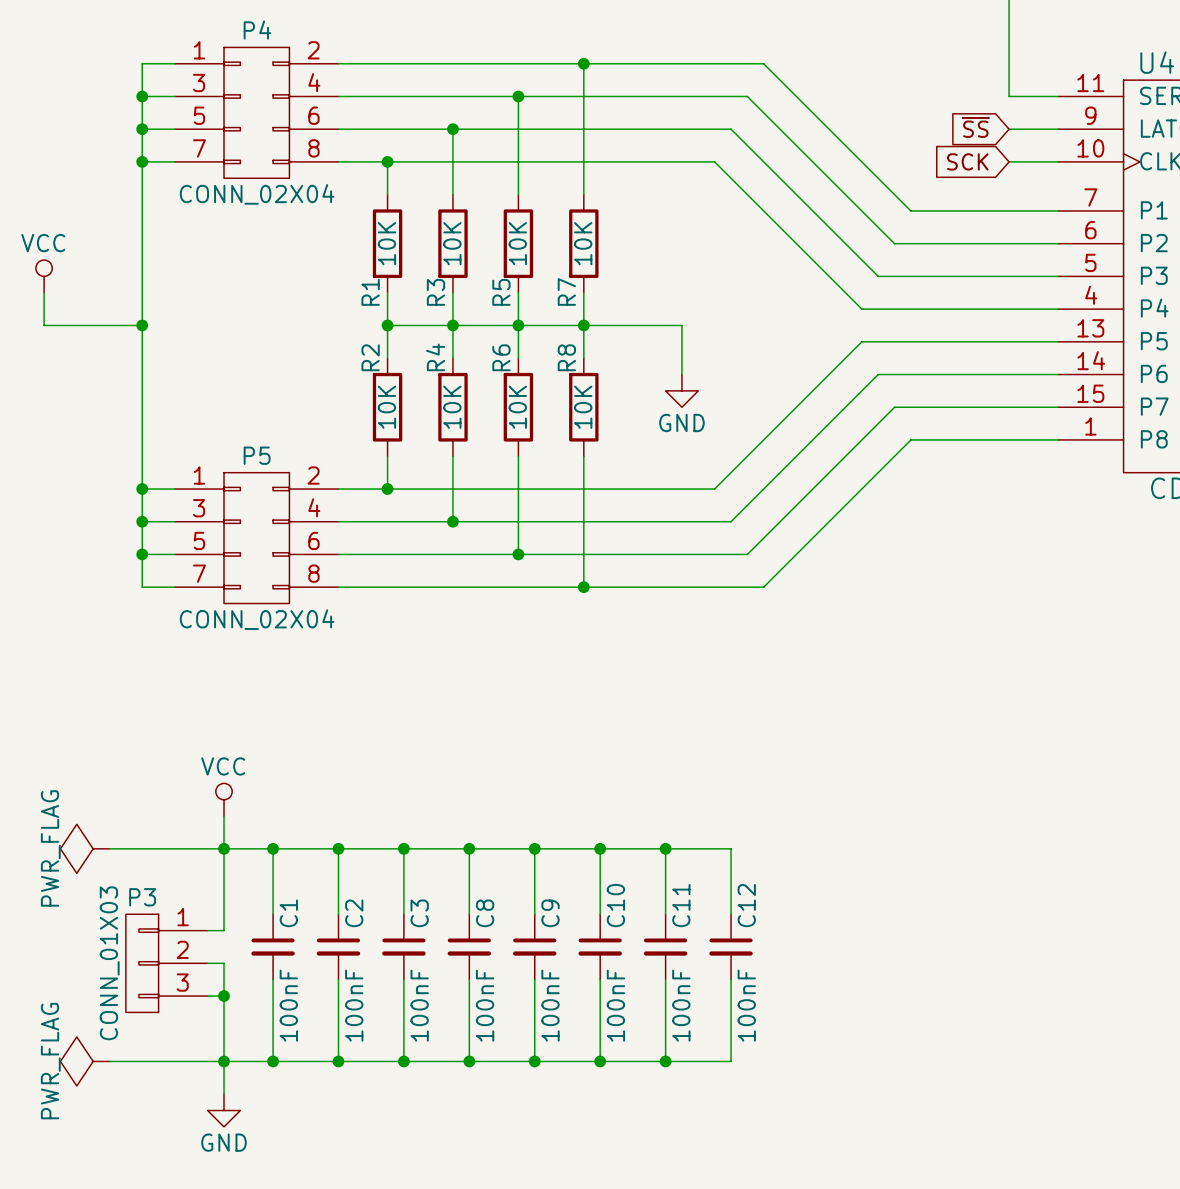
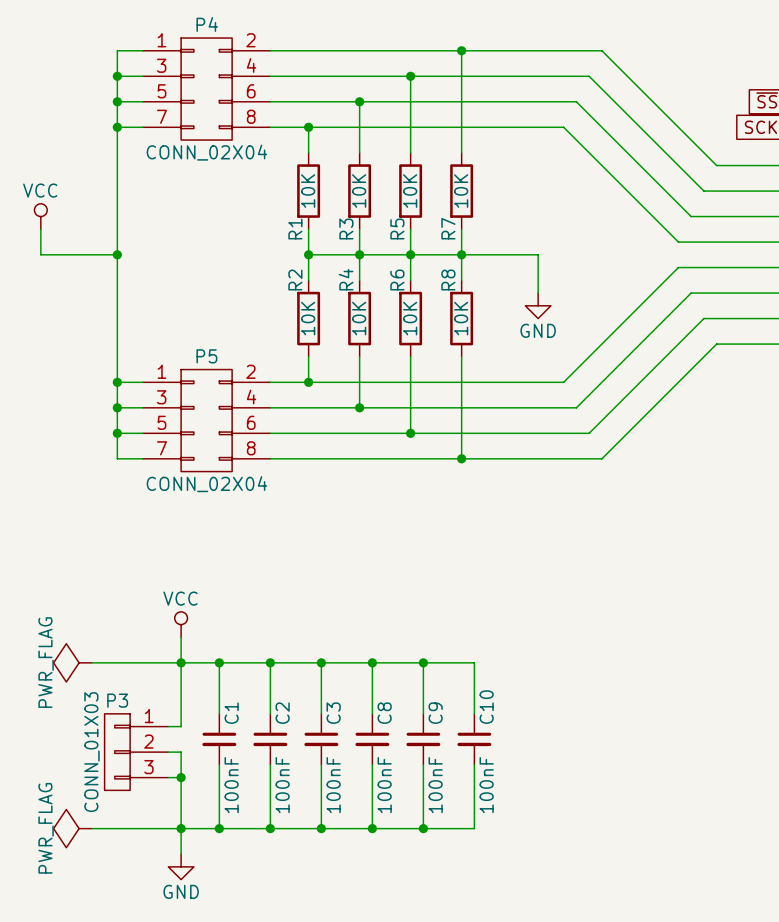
wire: (600, 848) (731, 848) (731, 914) -> none
junction: (600, 848) -> none
wire: (665, 848) (665, 914) -> none
junction: (665, 848) -> none
C11: 100nF (665, 946) -> none
C12: 100nF (731, 946) -> none
wire: (665, 979) (665, 1061) -> none
wire: (731, 979) (731, 1061) (600, 1061) -> none
junction: (600, 1061) -> none
junction: (665, 1061) -> none

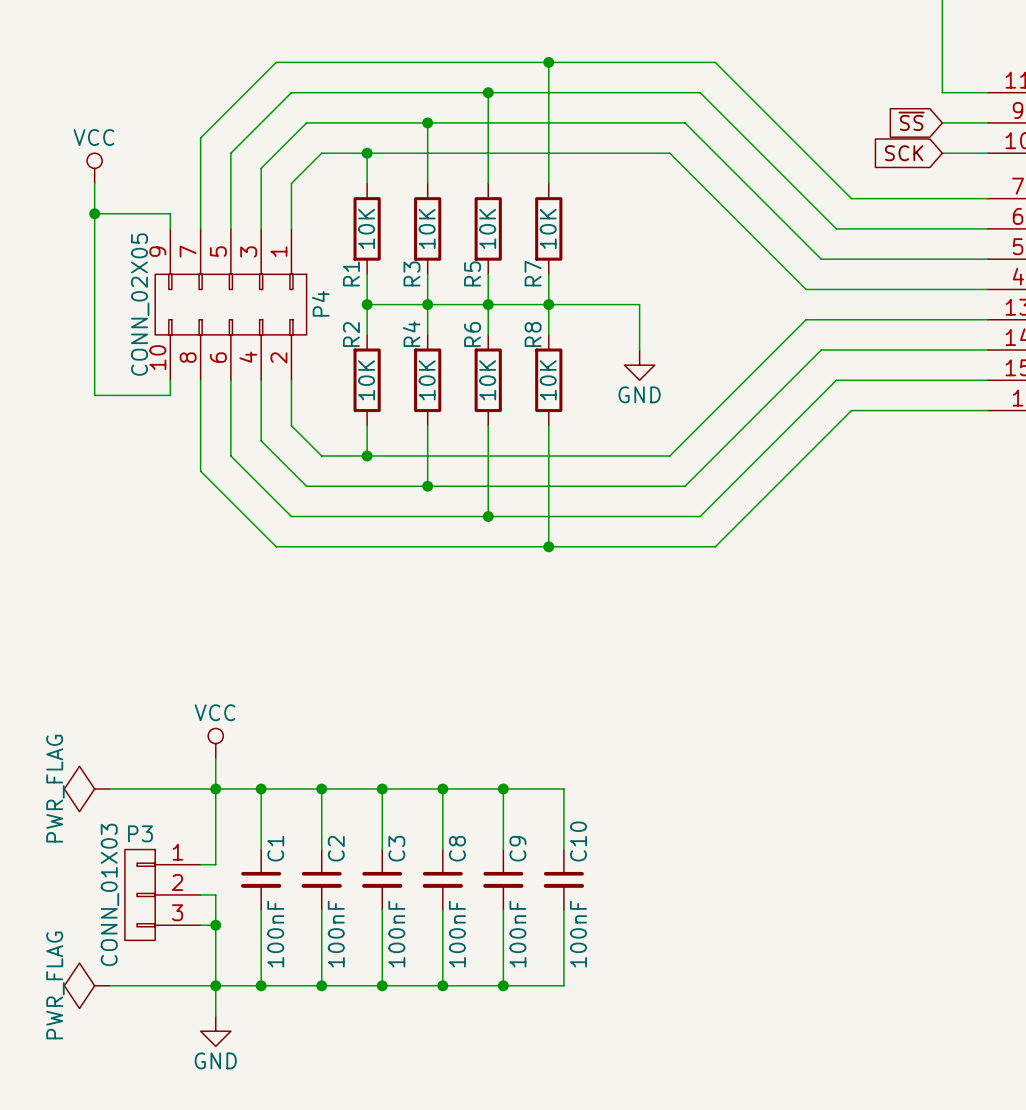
P4 name position: P4 (207, 24) -> P4 (320, 303)
P4 symbol: [142, 38, 271, 141] -> [155, 228, 307, 381]
wire: (142, 50) (117, 50) (117, 458) (142, 458) -> none
wire: none -> (321, 62) (276, 62) (200, 138) (200, 228)
wire: (117, 76) (142, 76) -> none
junction: (117, 76) -> none
wire: none -> (321, 92) (291, 92) (230, 153) (230, 228)
wire: (117, 101) (142, 101) -> none
junction: (117, 101) -> none
wire: none -> (321, 122) (306, 122) (261, 168) (261, 228)
wire: (117, 127) (142, 127) -> none
junction: (117, 127) -> none
wire: none -> (321, 153) (291, 183) (291, 228)
wire: none -> (94, 183) (94, 395) (170, 395) (170, 380)
P4 value: CONN_02X04 (206, 152) -> CONN_02X05 (140, 304)
wire: none -> (94, 213) (170, 213) (170, 228)
junction: none -> (94, 213)
power symbol position: VCC (40, 216) -> VCC (94, 168)
wire: (40, 229) (40, 254) (117, 254) -> none
junction: (117, 254) -> none
wire: none -> (200, 380) (200, 471) (276, 546) (321, 546)
wire: none -> (230, 380) (230, 455) (291, 516) (321, 516)
wire: none -> (261, 380) (261, 440) (306, 486) (321, 486)
wire: none -> (291, 380) (291, 425) (321, 455)
wire: (117, 382) (142, 382) -> none
junction: (117, 382) -> none
wire: (117, 407) (142, 407) -> none
junction: (117, 407) -> none
P5: CONN_02X04 (206, 420) -> none
wire: (117, 433) (142, 433) -> none
junction: (117, 433) -> none

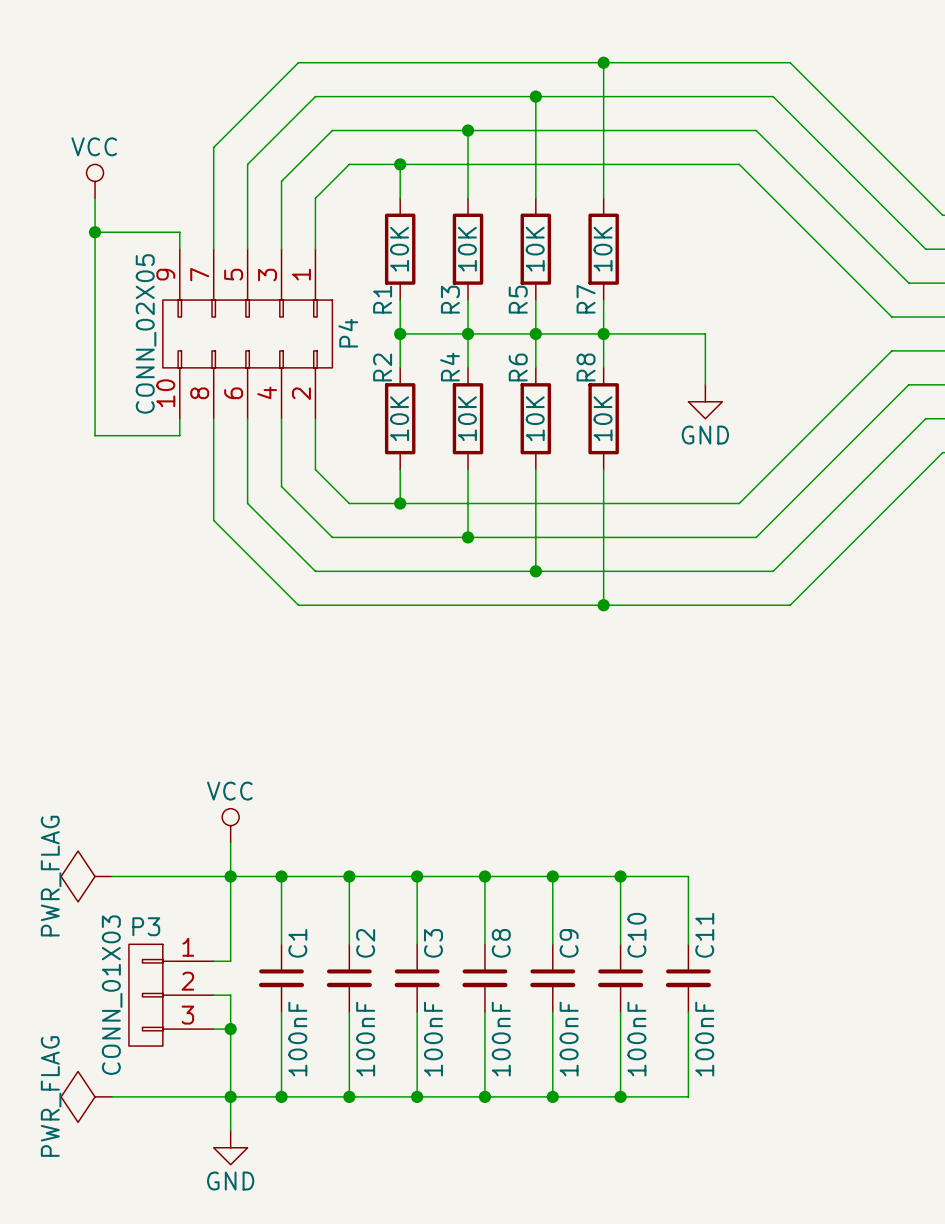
wire: none -> (620, 876) (688, 876) (688, 944)
junction: none -> (620, 876)
C11: none -> 100nF (688, 978)
wire: none -> (688, 1012) (688, 1096) (620, 1096)
junction: none -> (620, 1096)

